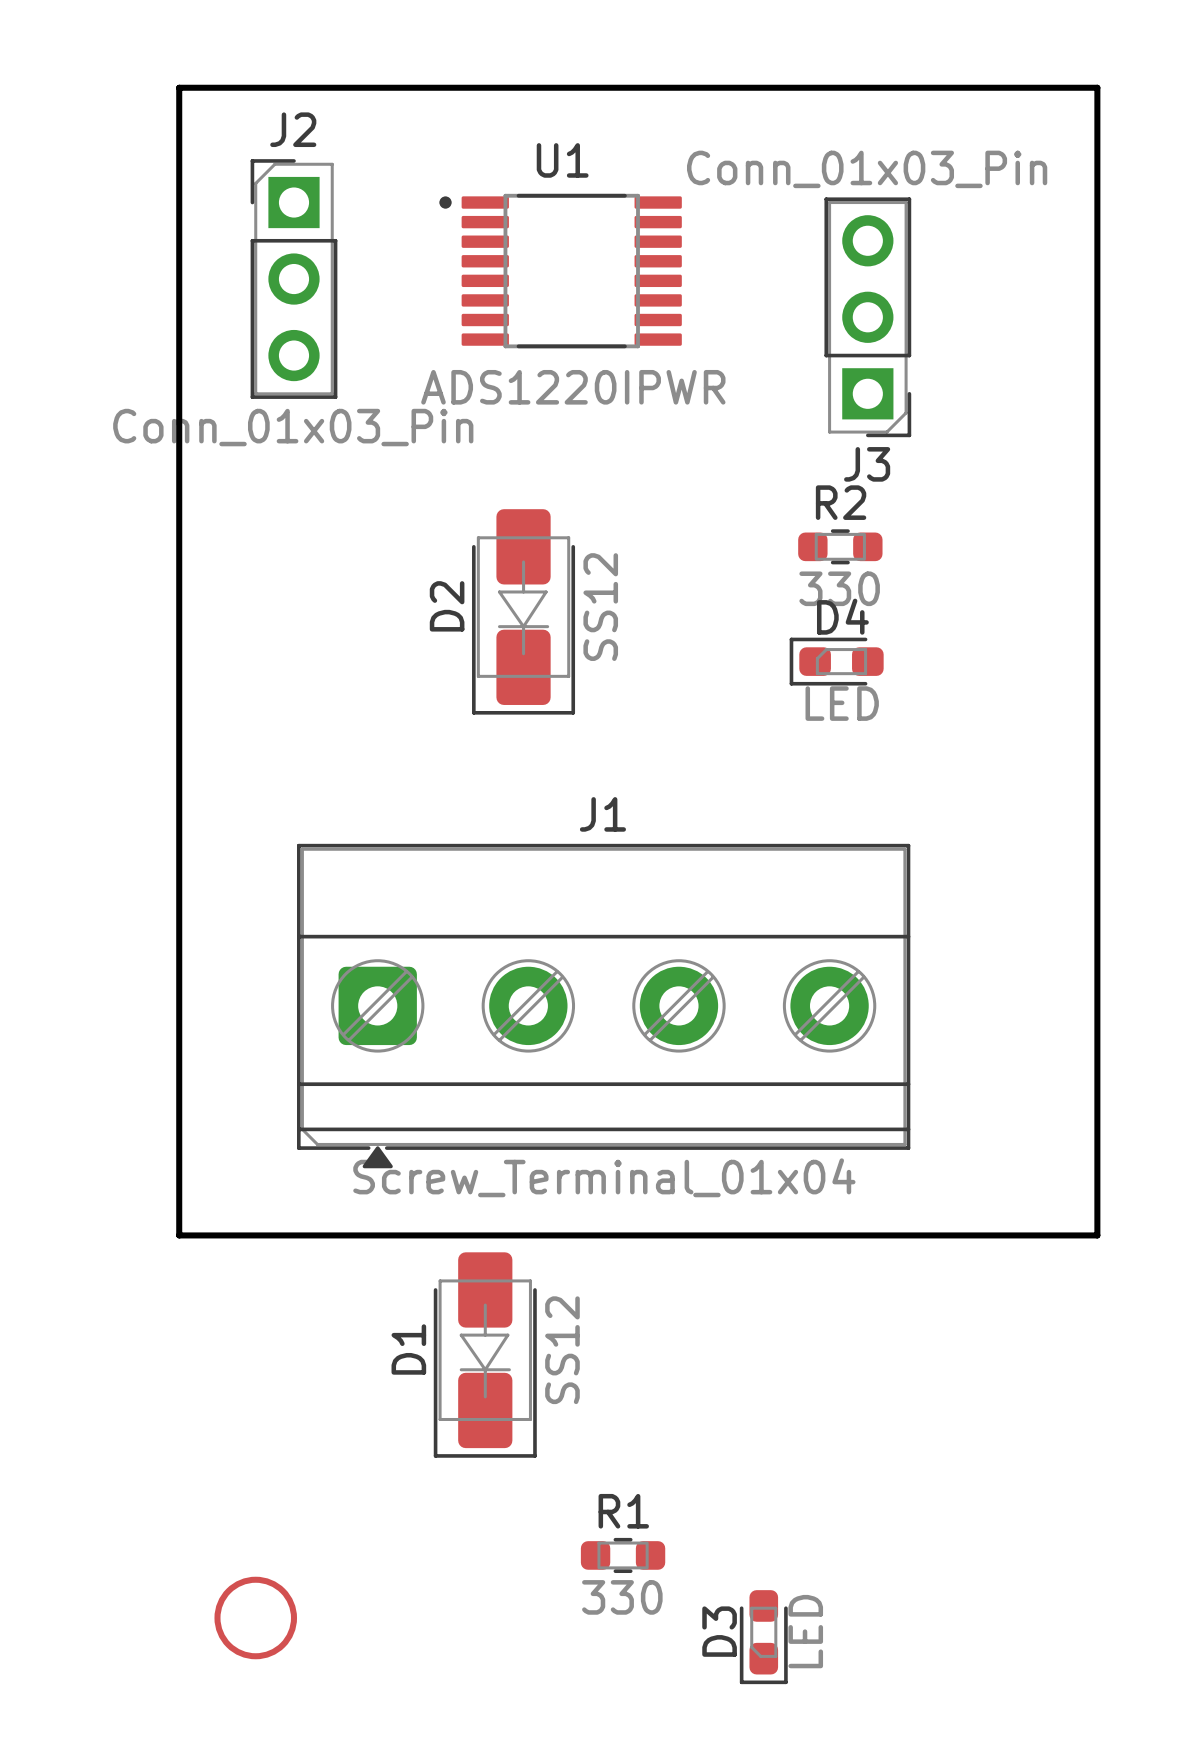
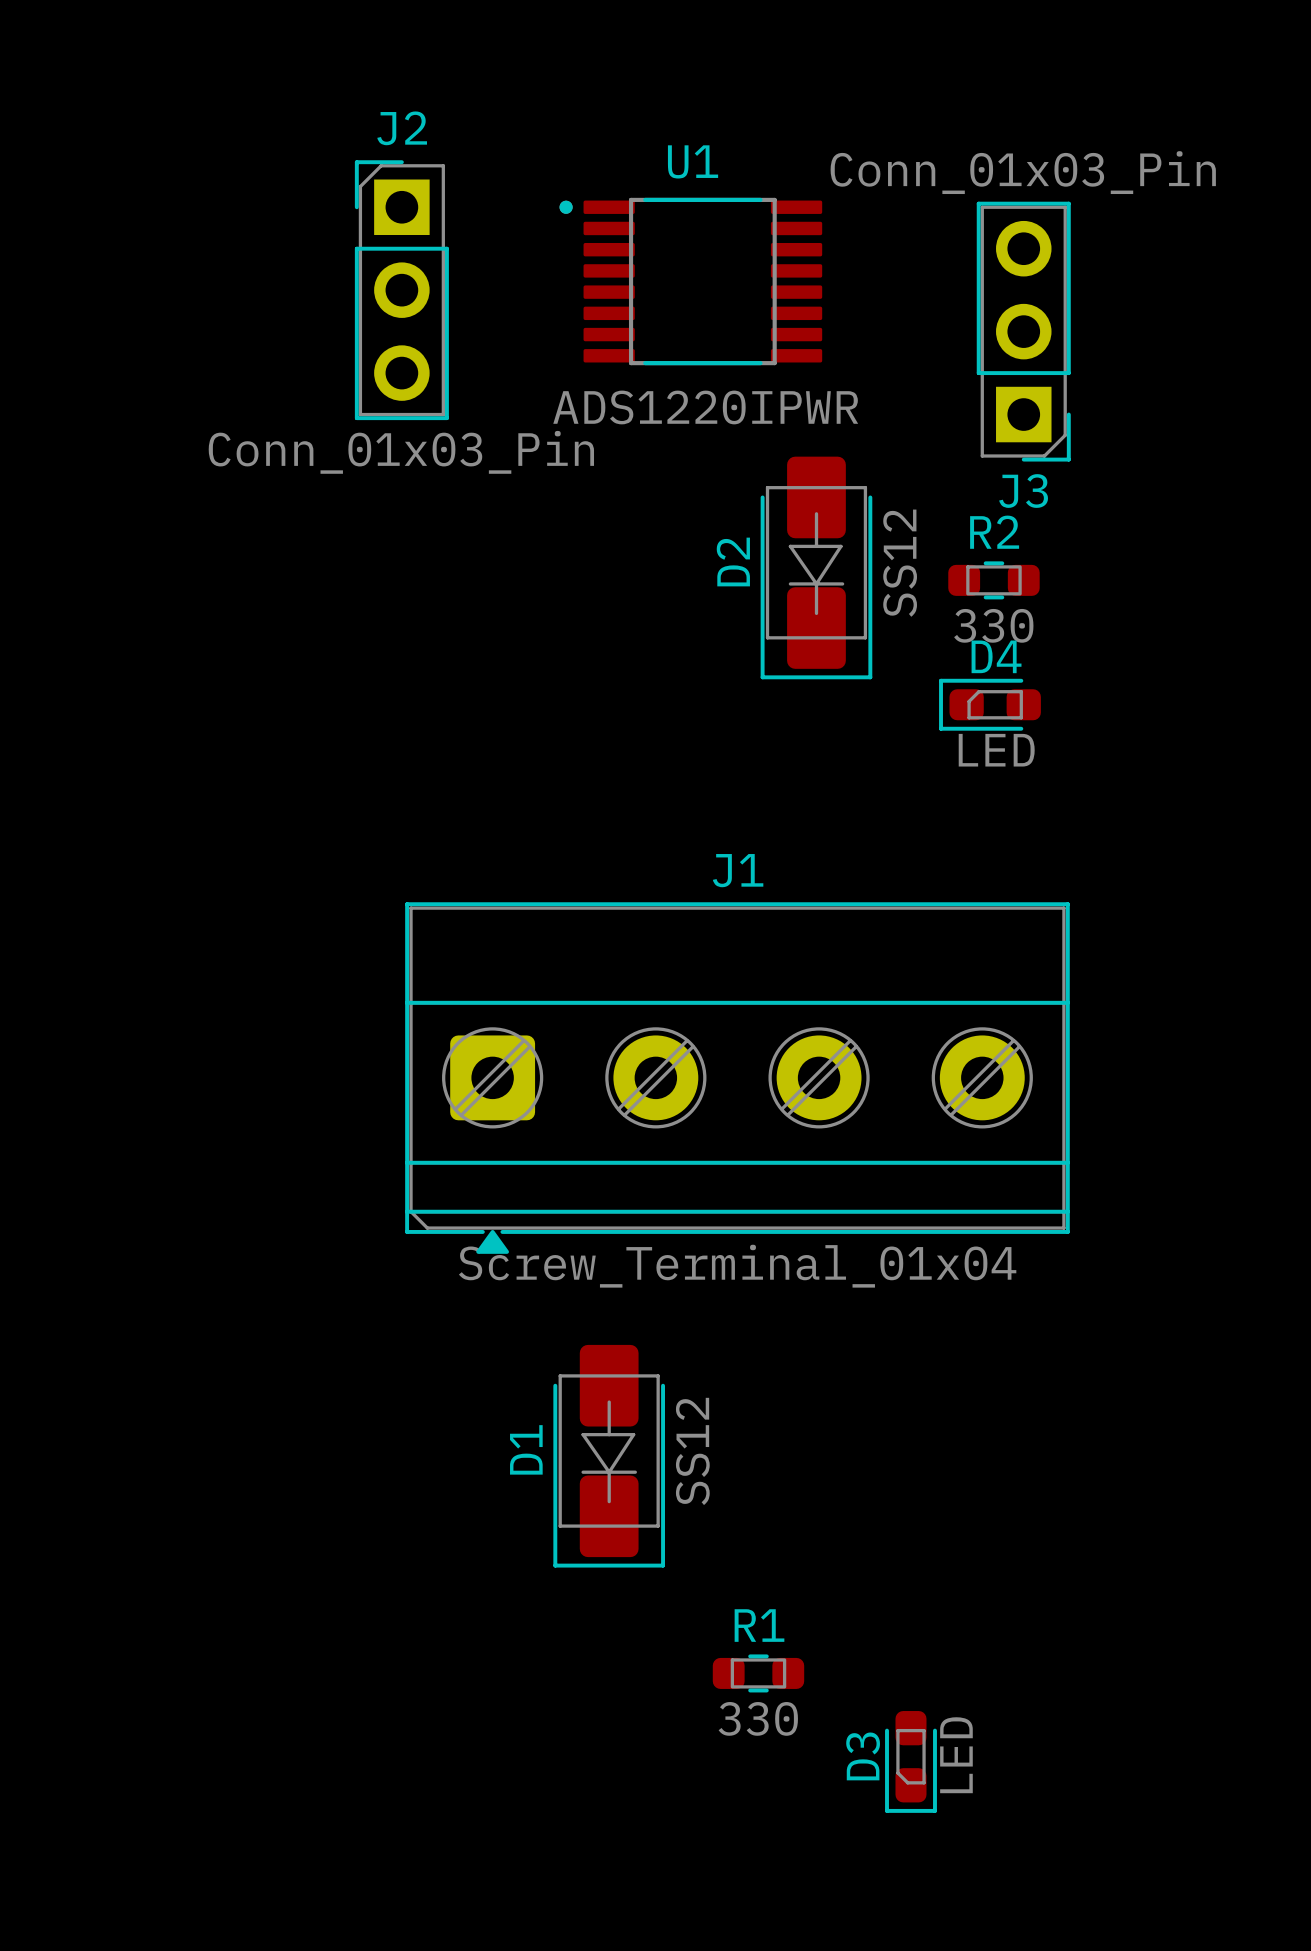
board edge: (179, 87) (1097, 87) (1097, 1235) (179, 1235) (179, 87) -> none
D2 position: (523, 611) -> (816, 567)
drawing: [214, 1576, 298, 1660] -> none

